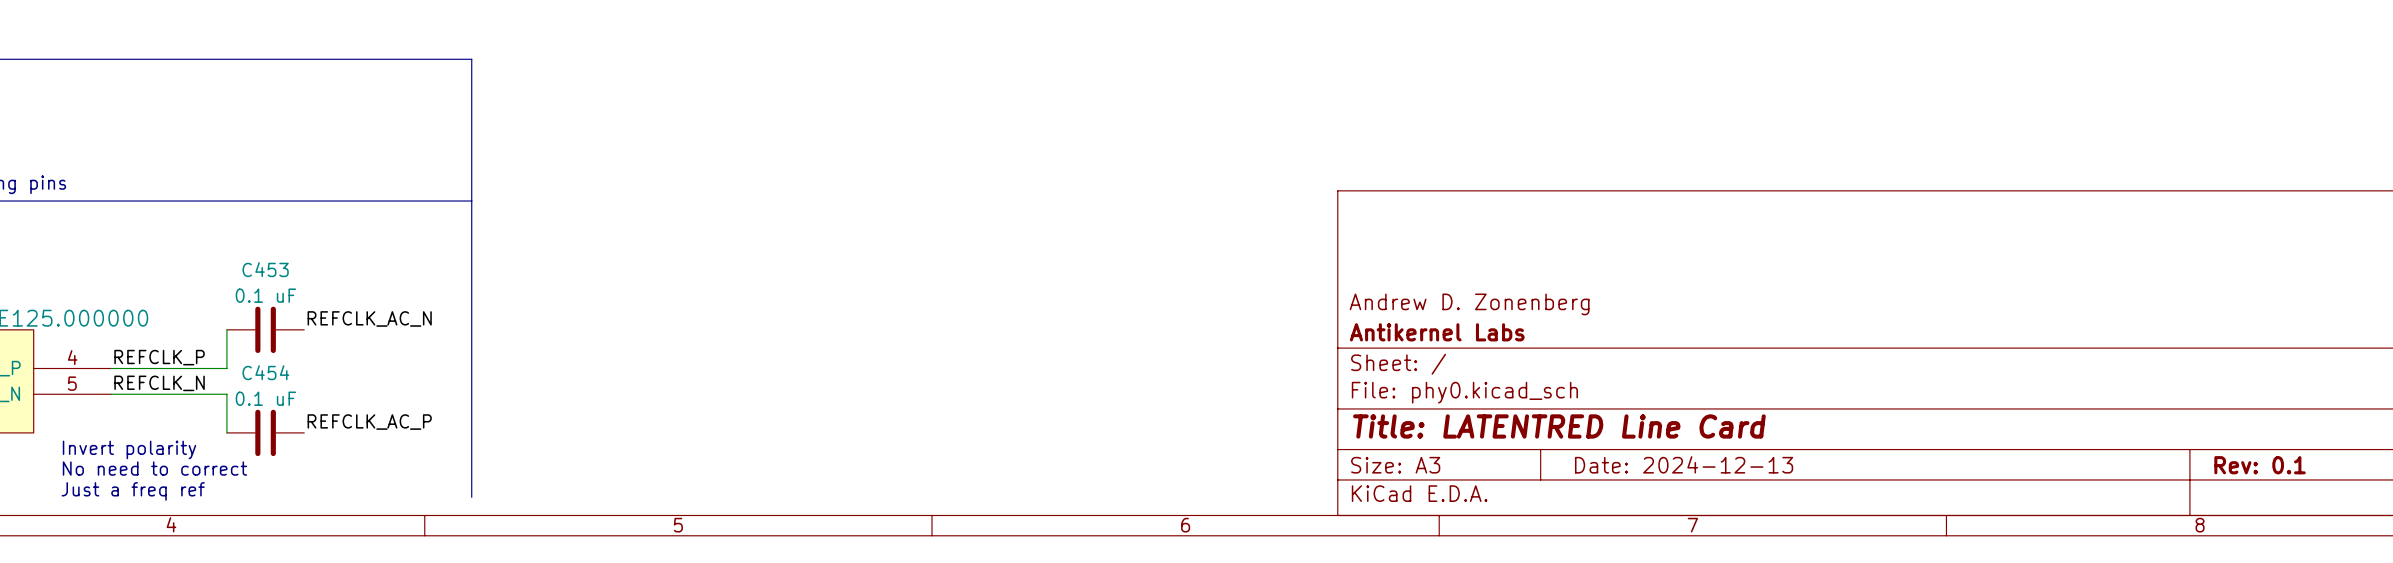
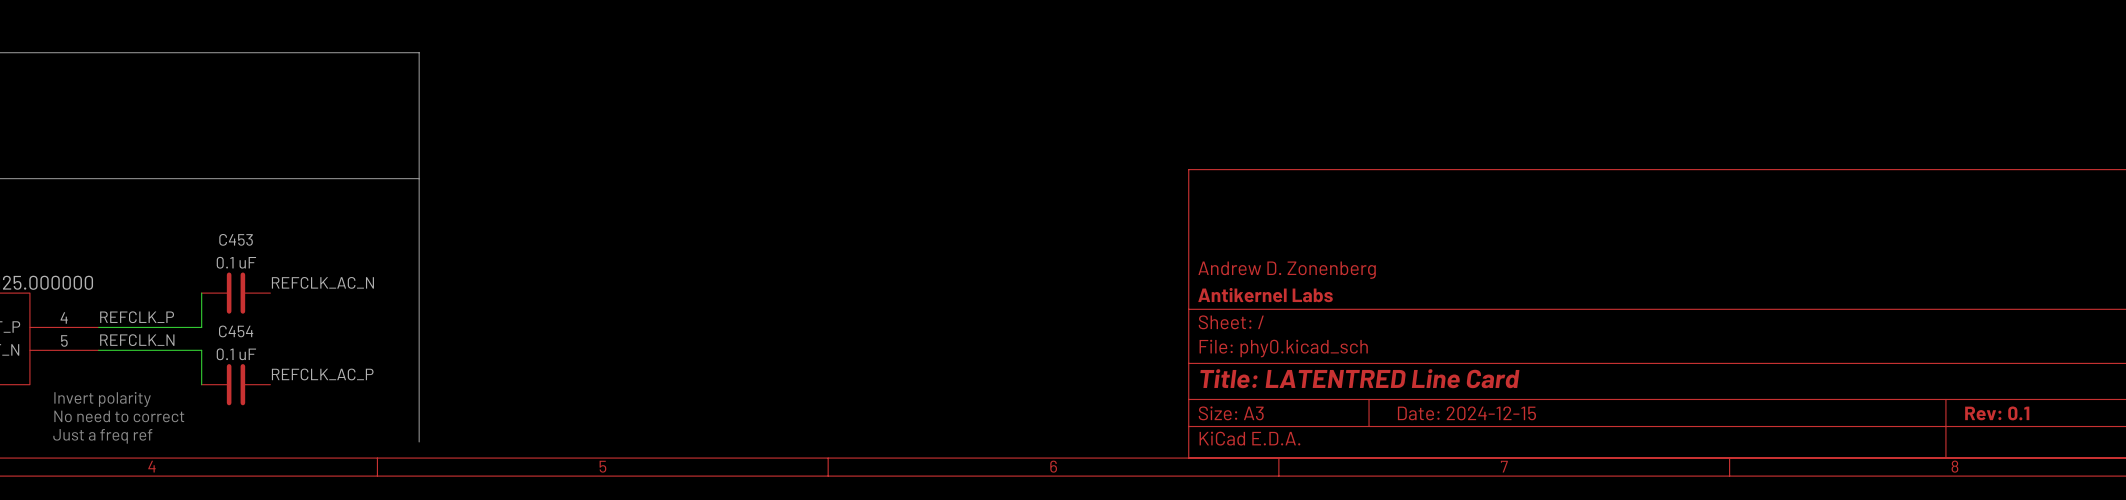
title block: Date: 2024-12-13 (1684, 464) -> Date: 2024-12-15 (1466, 413)

